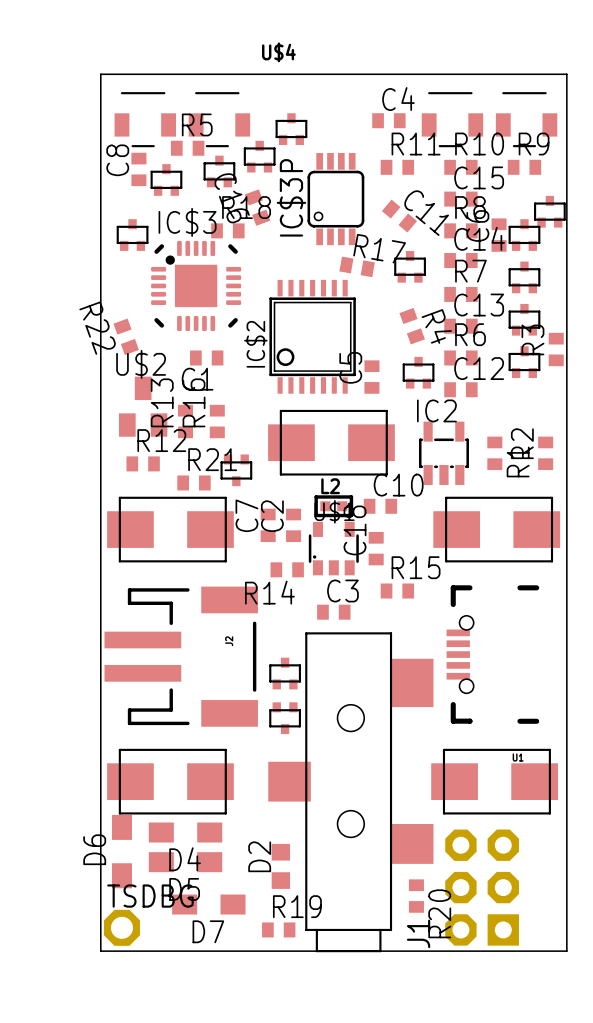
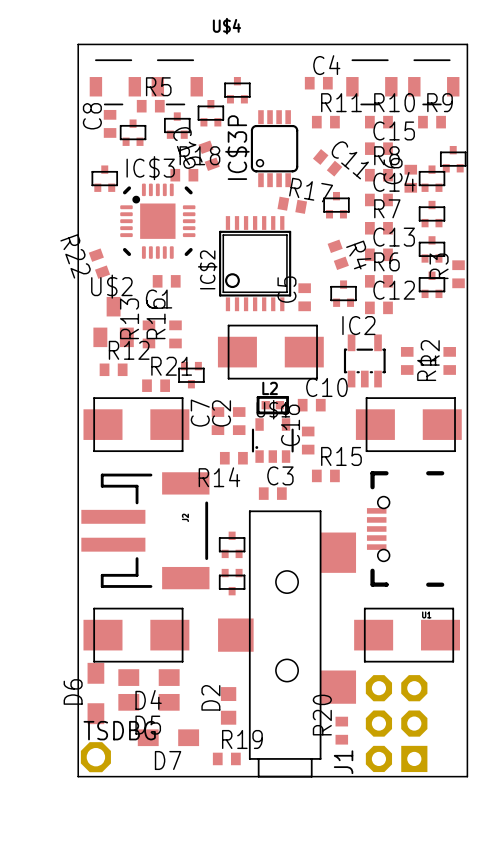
R20 name position: R20 (439, 913) -> R20 (322, 715)

